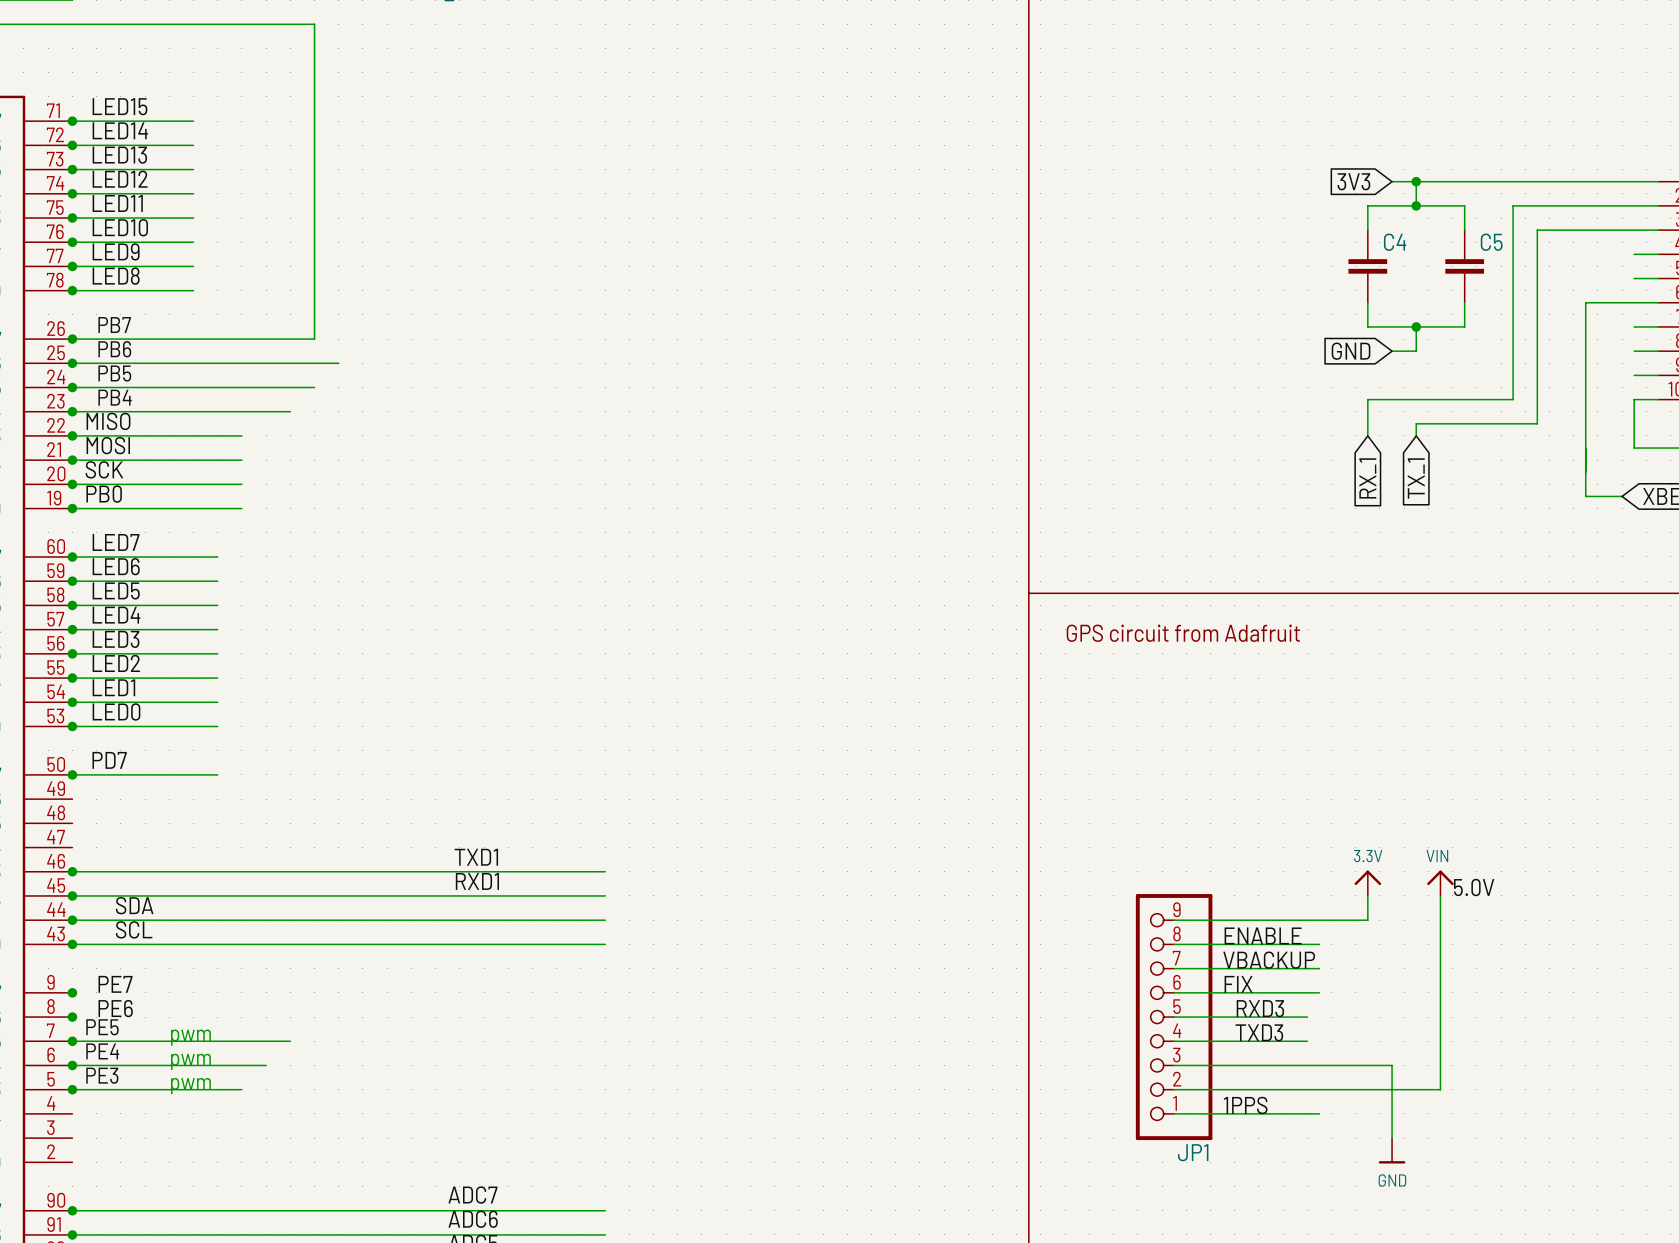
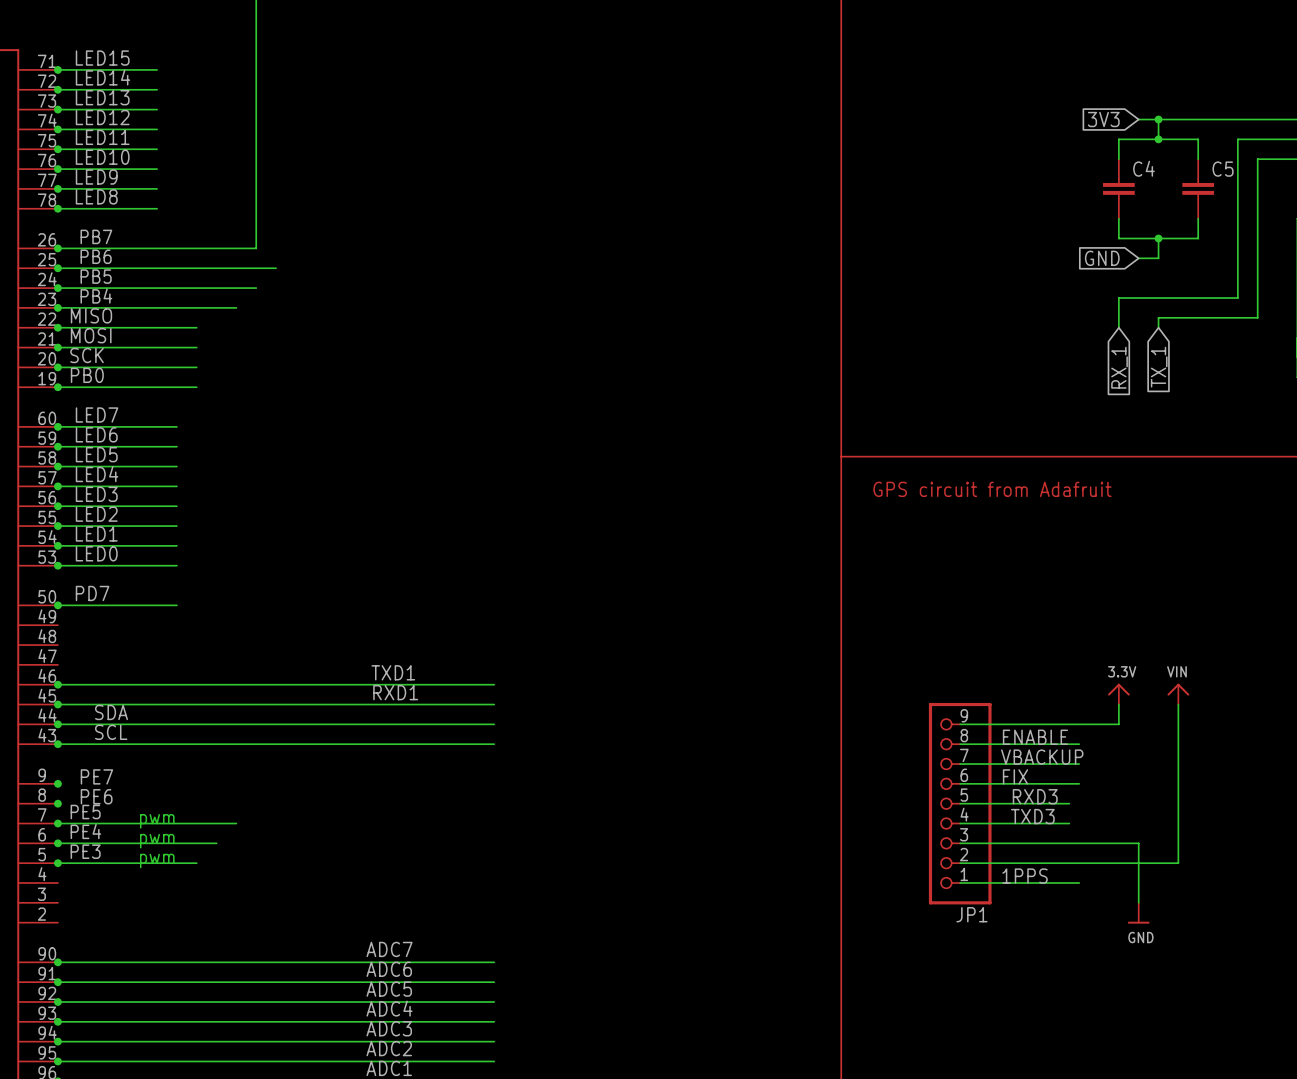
label: 5.0V (1474, 887) -> none

